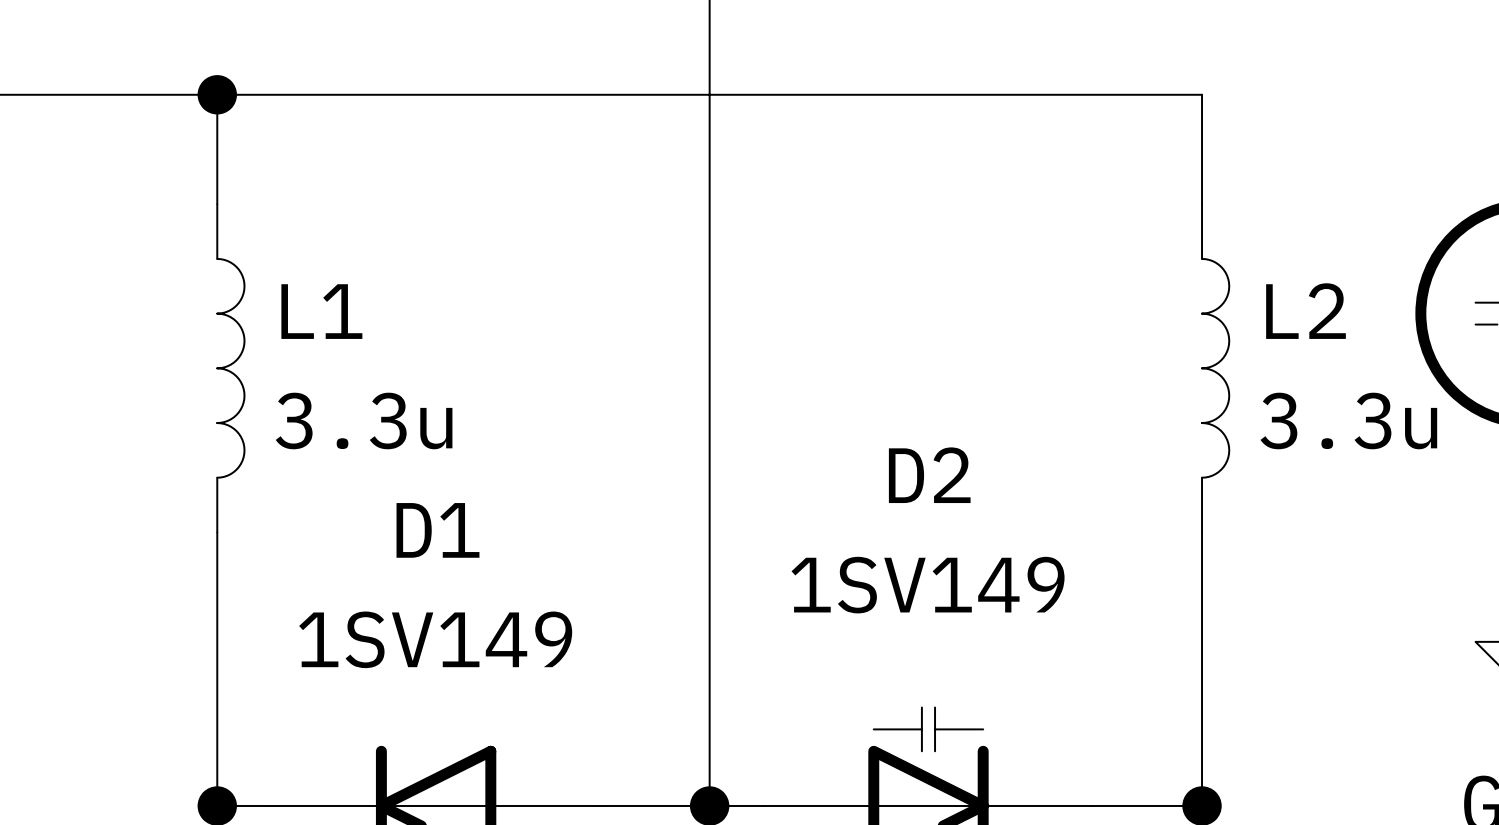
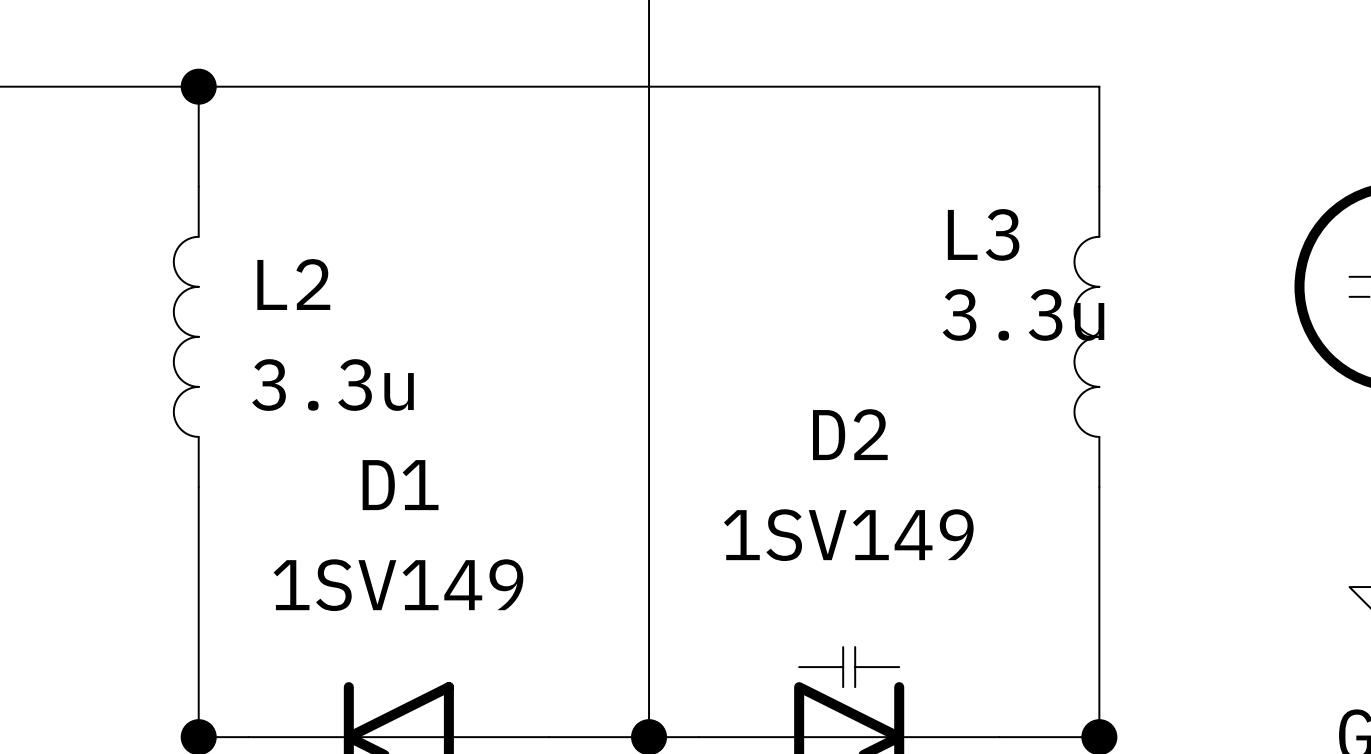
L1: 3.3u (230, 368) -> none
L3: none -> 3.3u (1086, 336)
L2 rotation: 0° (1215, 368) -> 180° (186, 336)
L2 position: (1215, 368) -> (186, 336)

